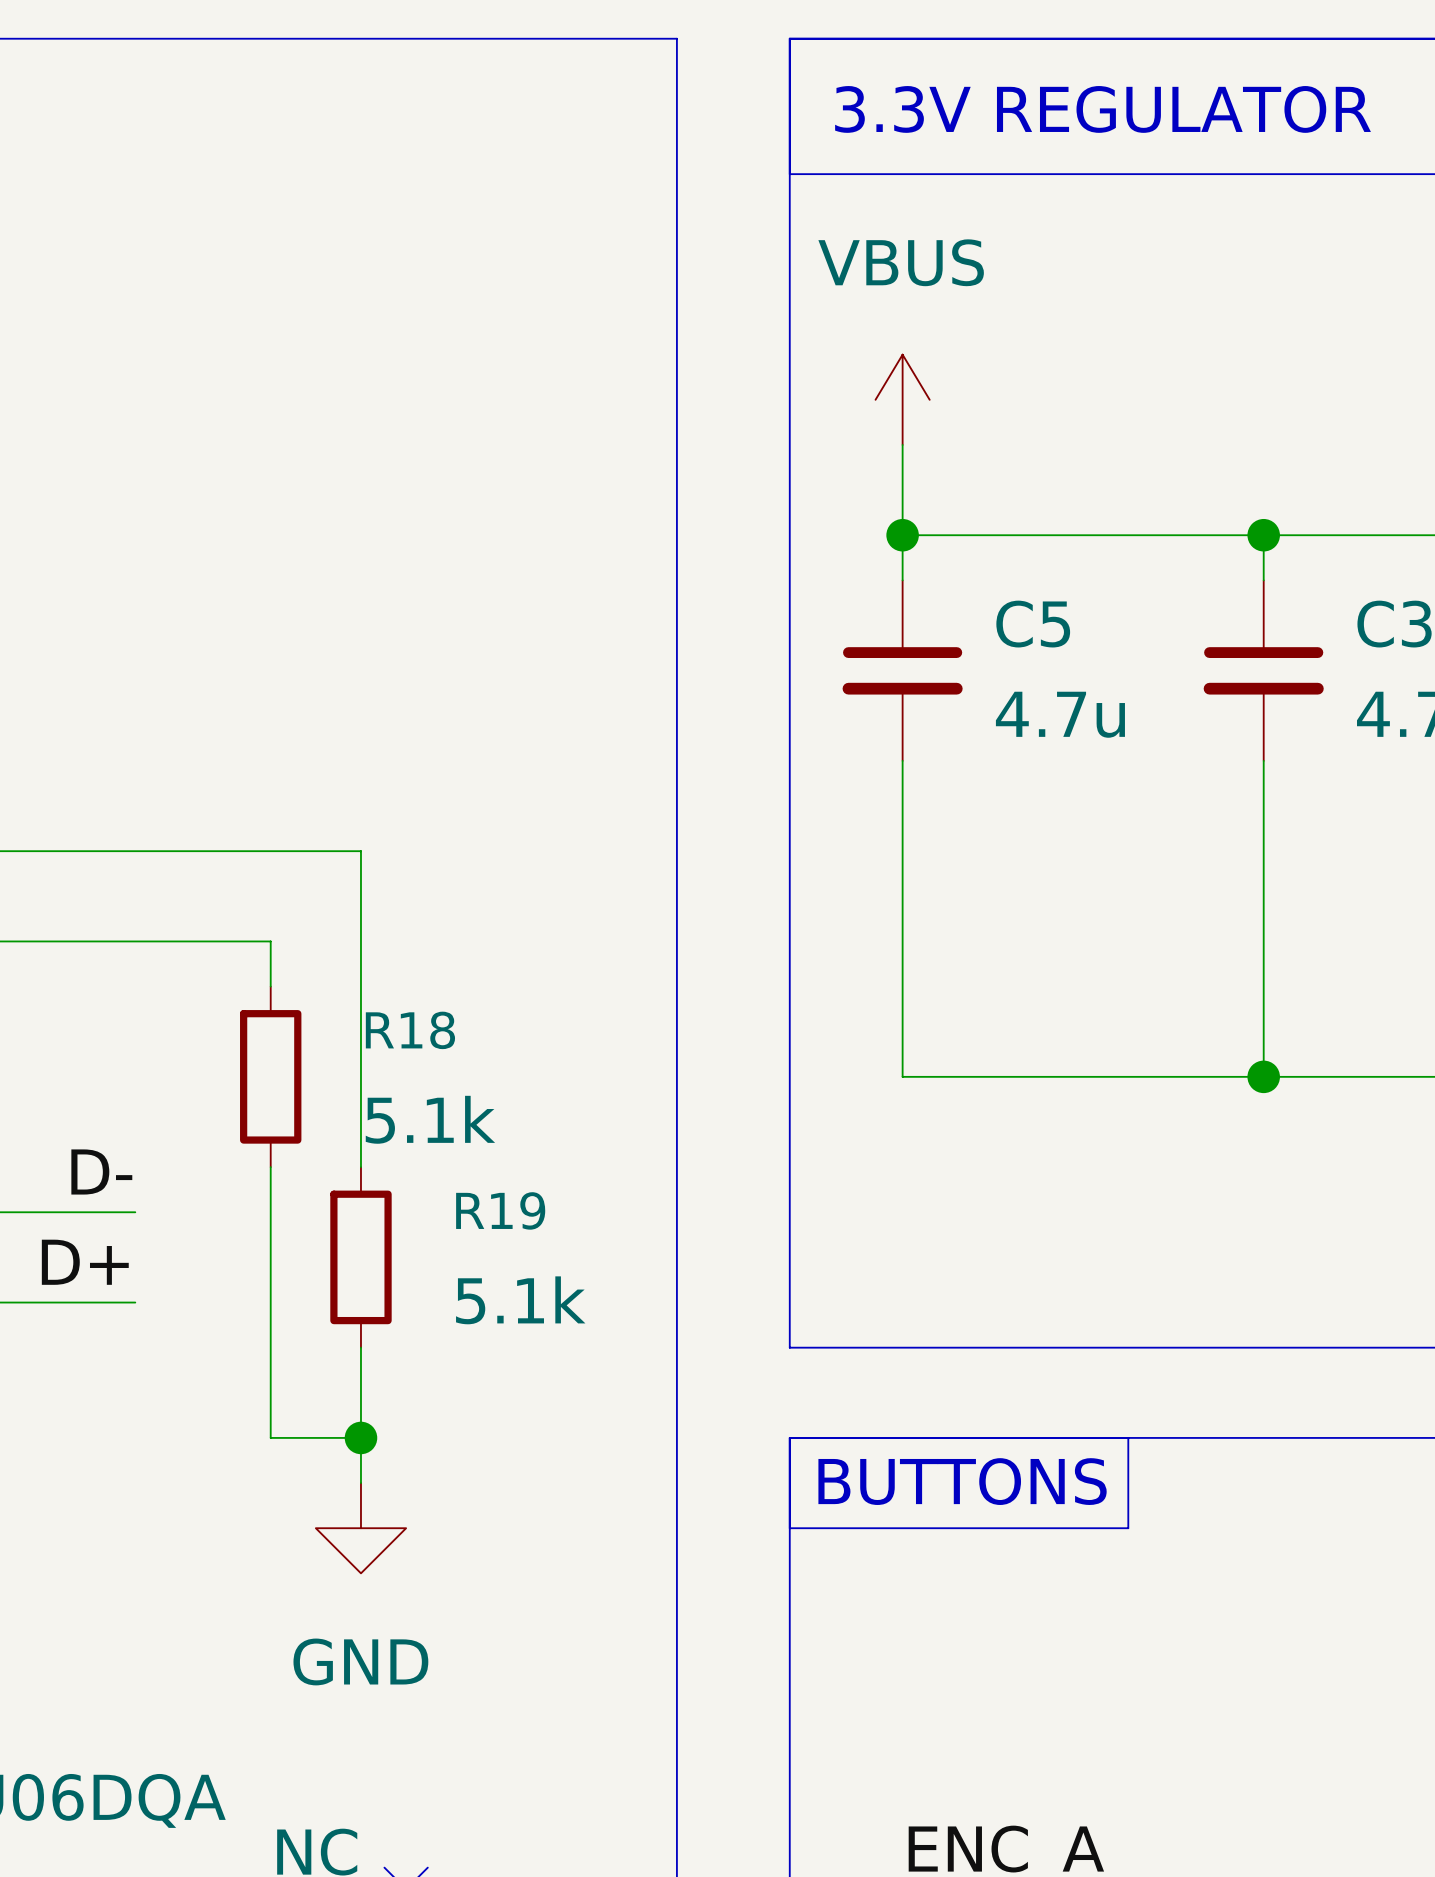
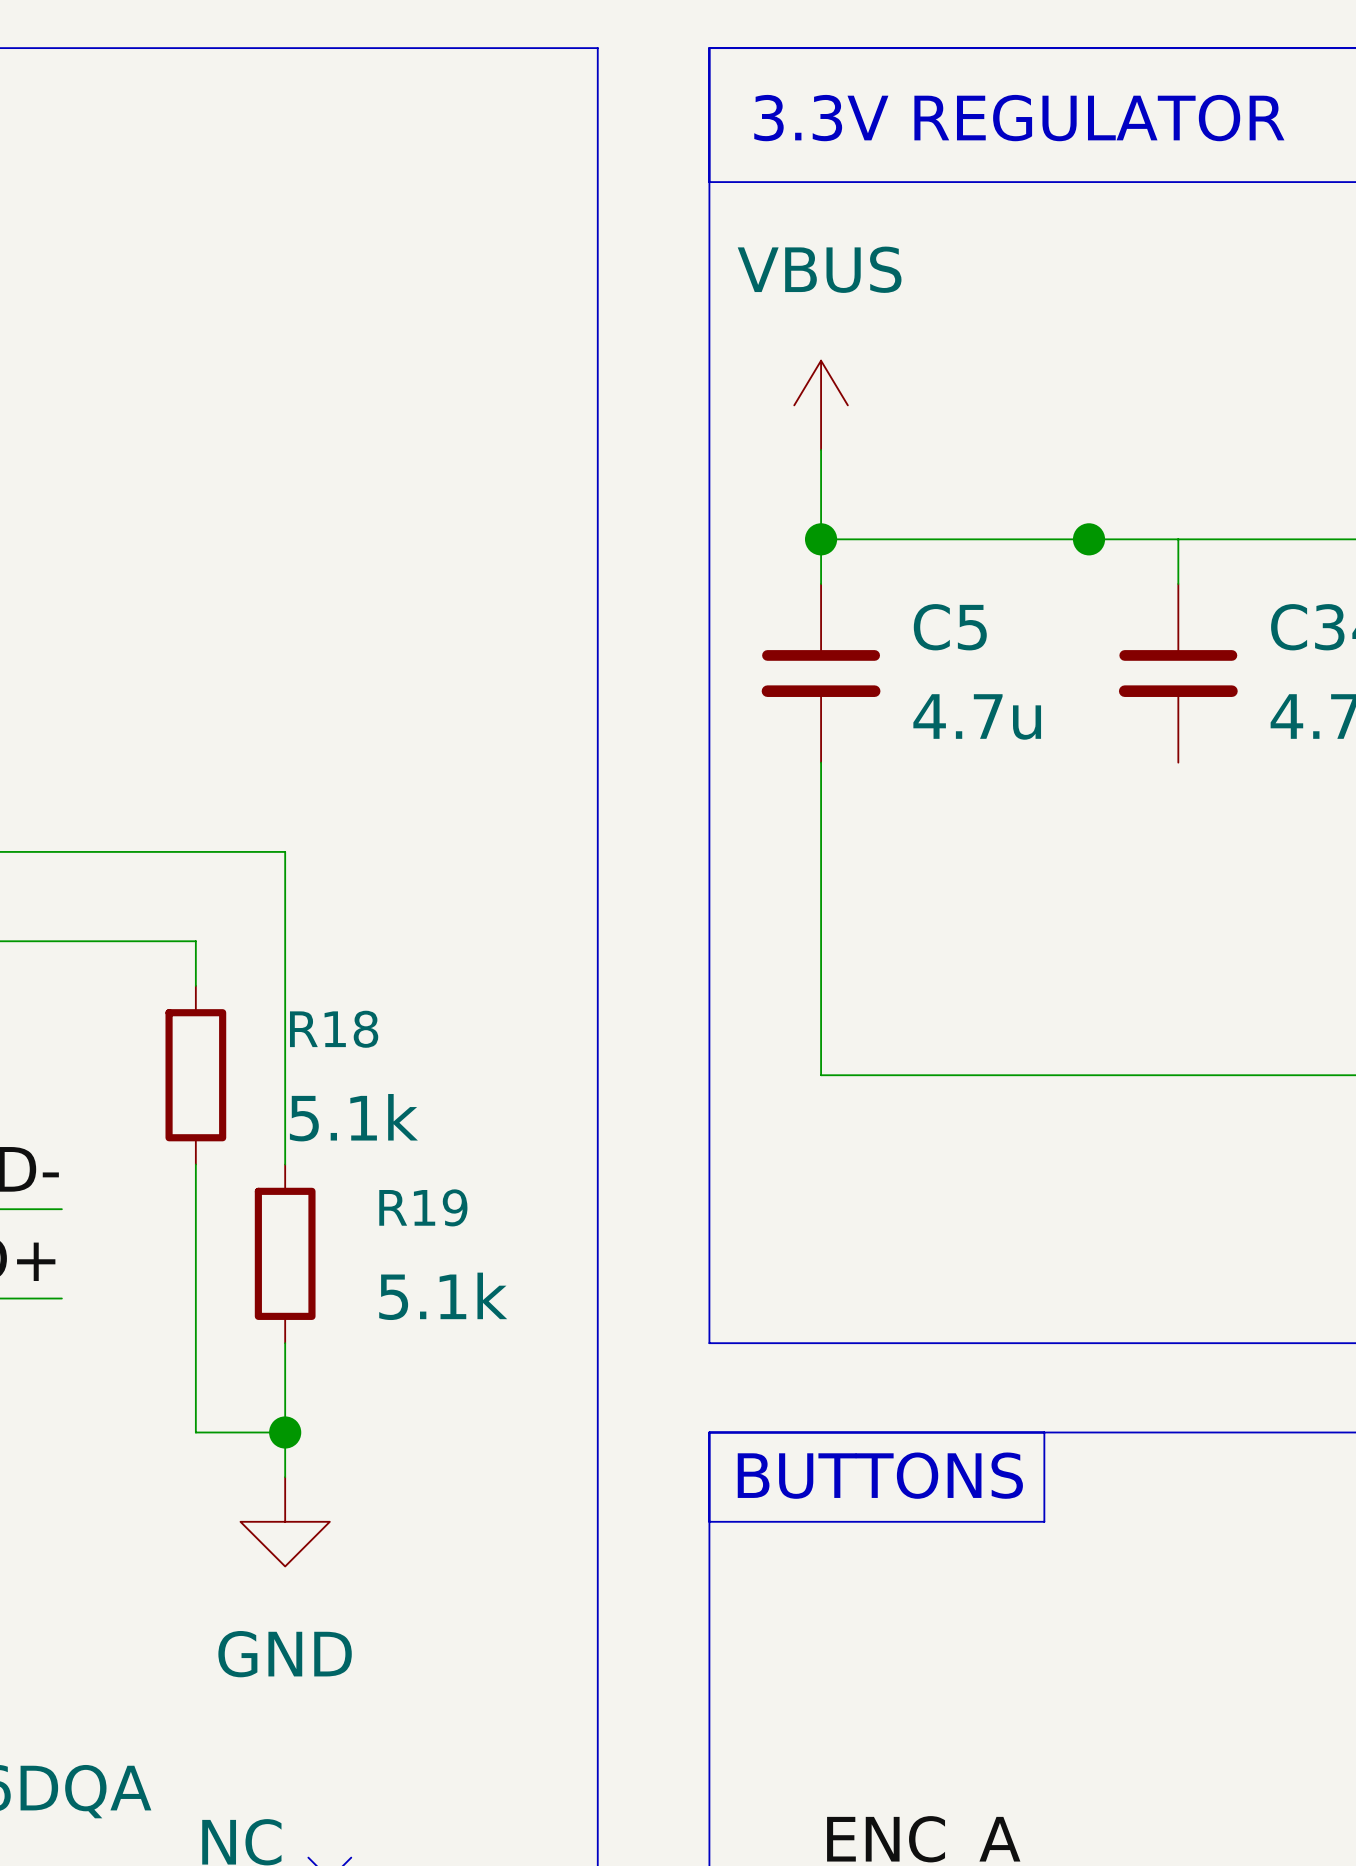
junction position: (1263, 535) -> (1089, 539)
wire: (1263, 760) (1263, 1076) -> none
junction: (1263, 1076) -> none

